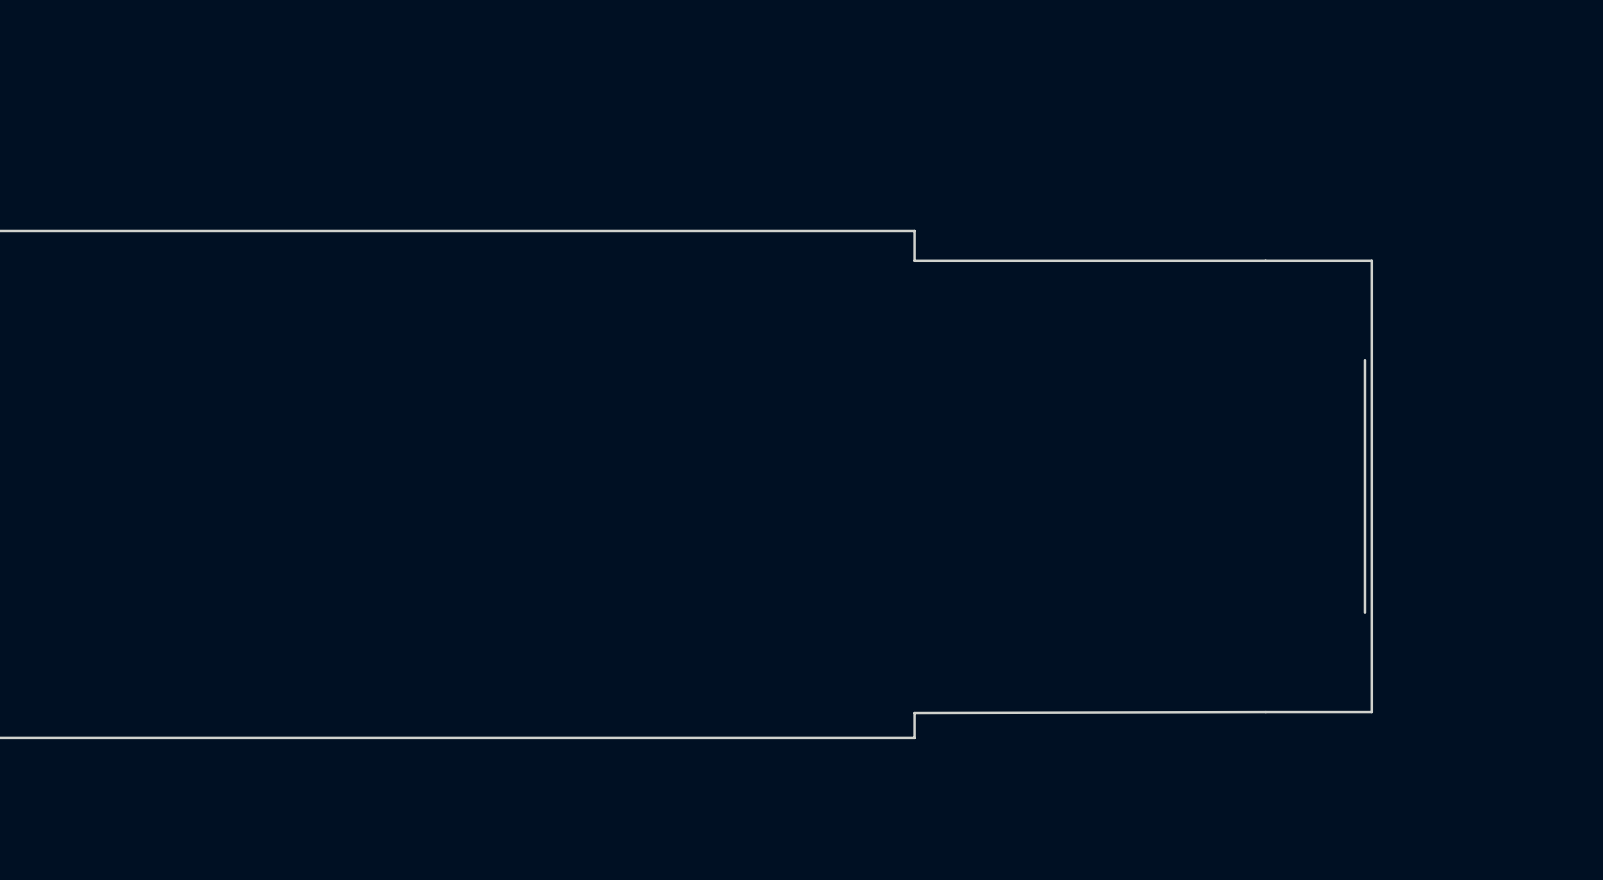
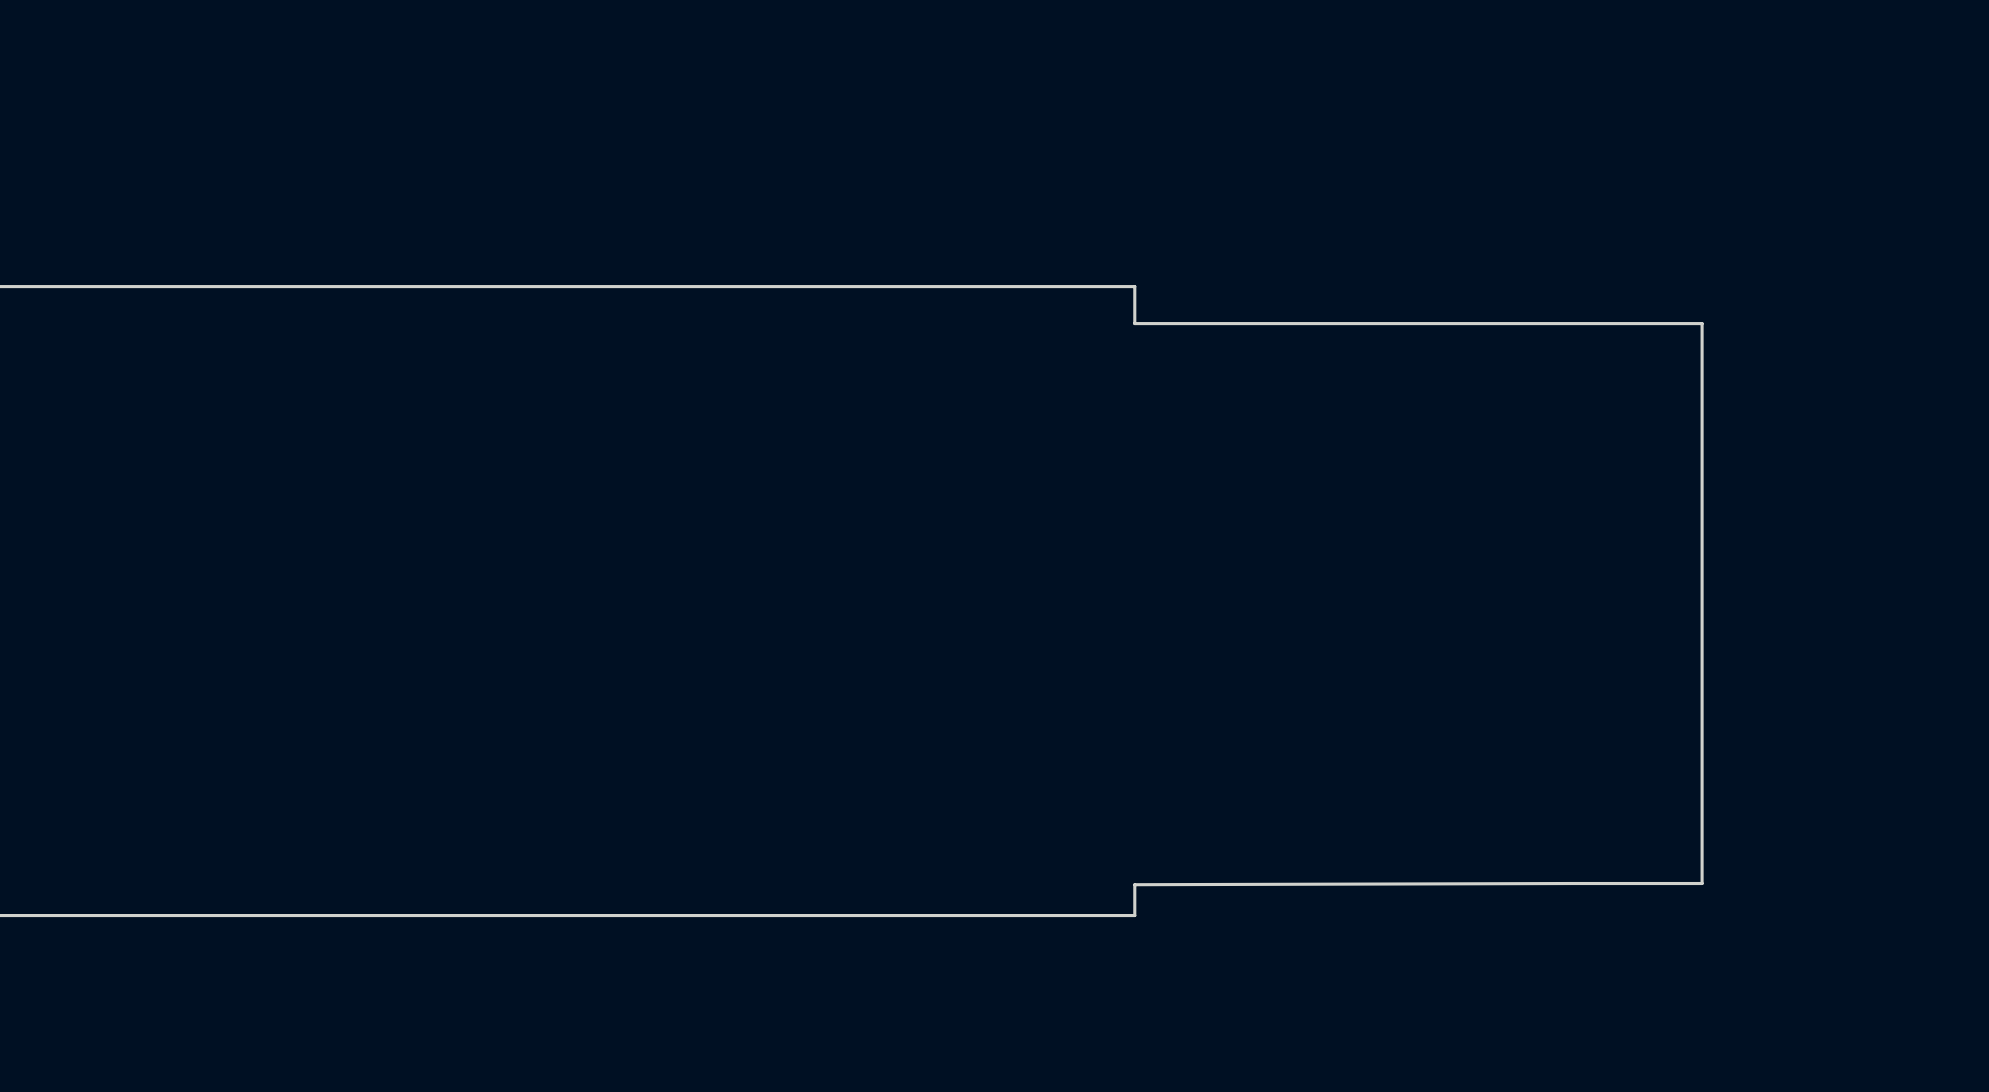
board edge: (1364, 360) (1364, 612) -> none

